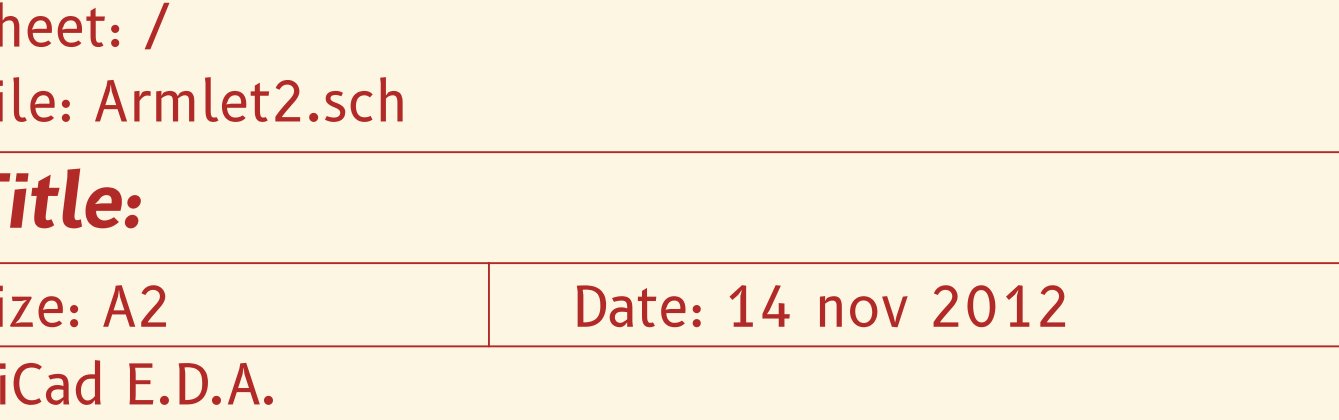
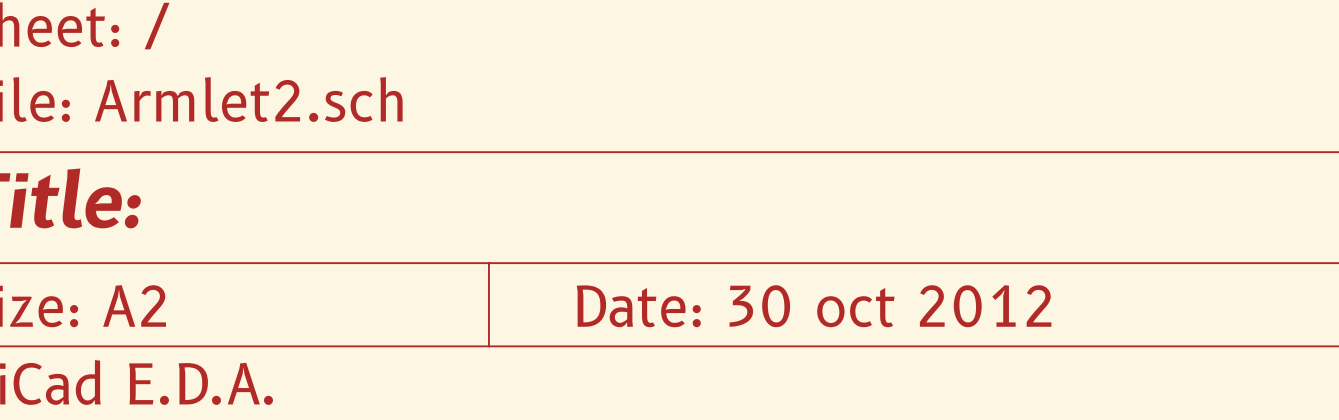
title block: Date: 14 nov 2012 (820, 306) -> Date: 30 oct 2012 (814, 306)

